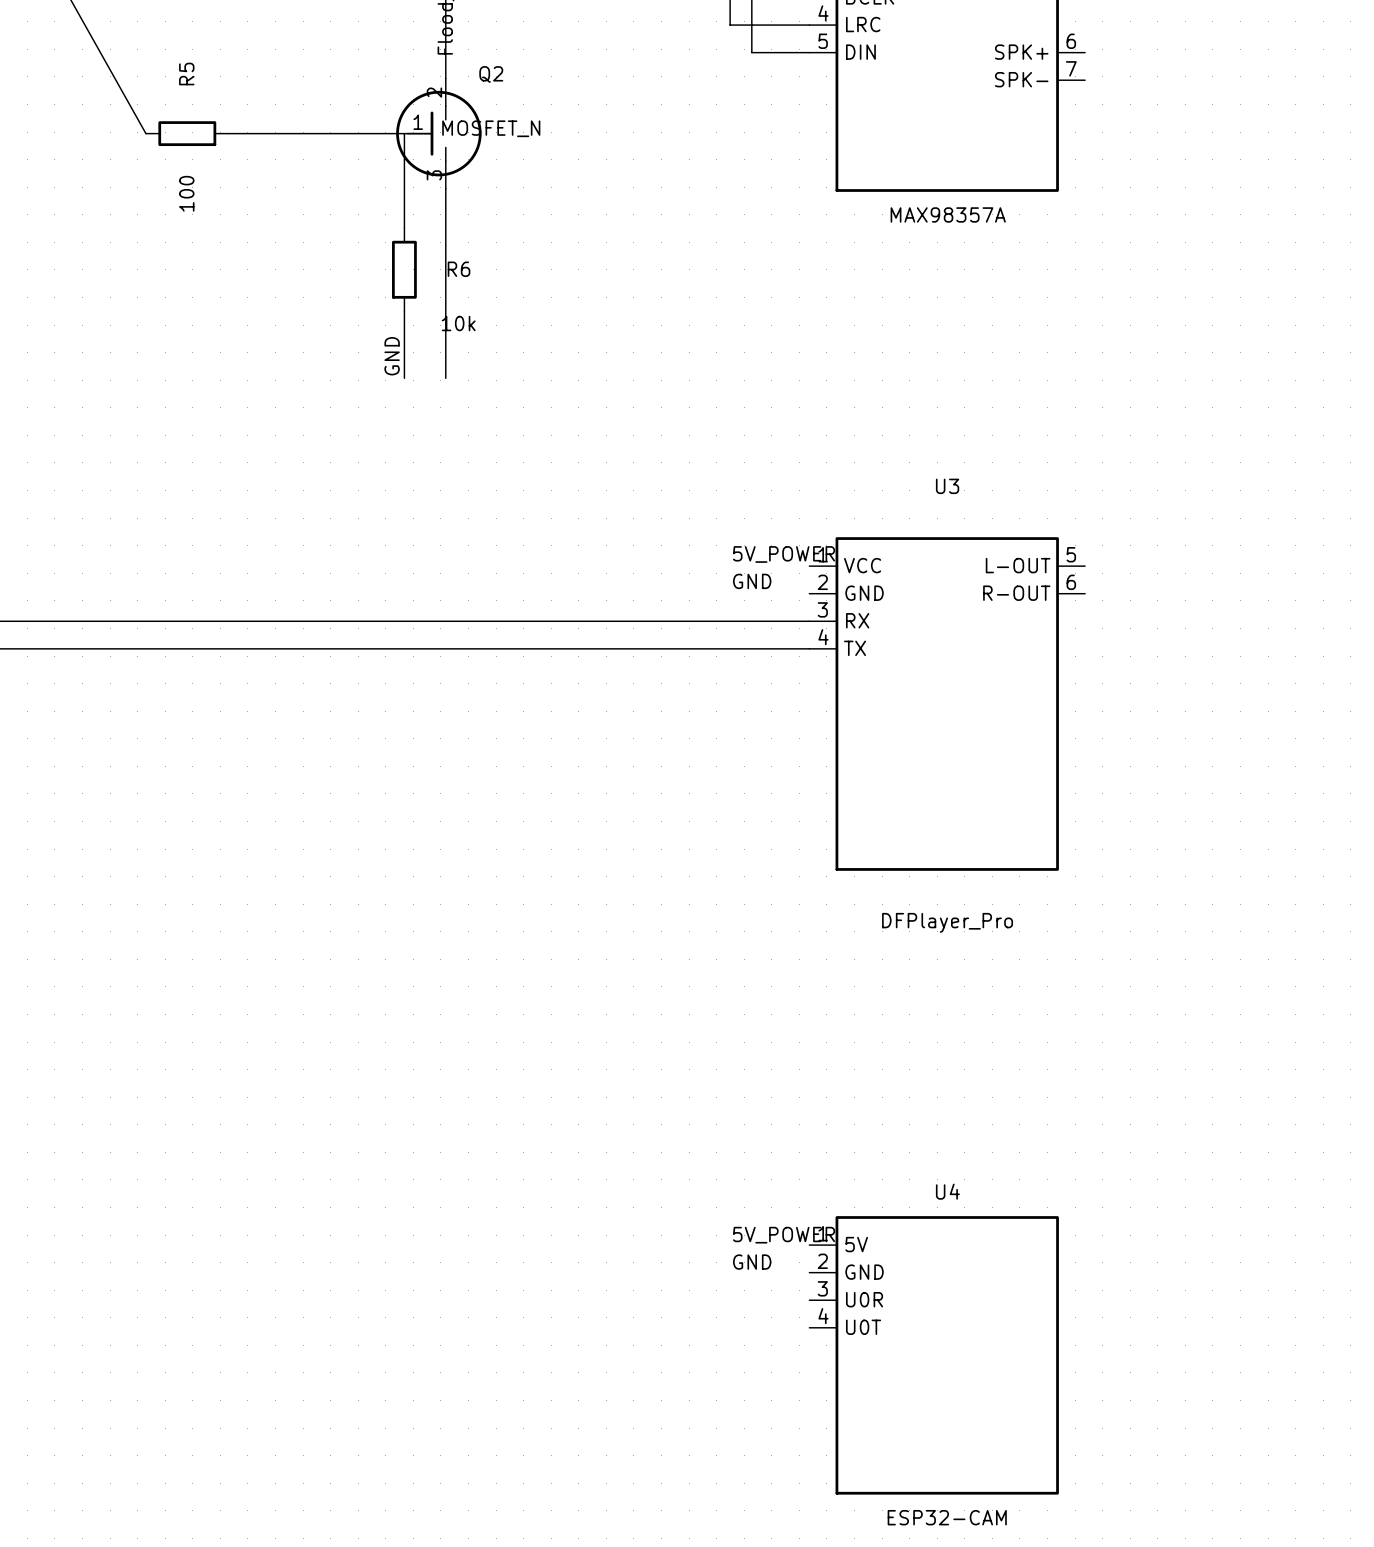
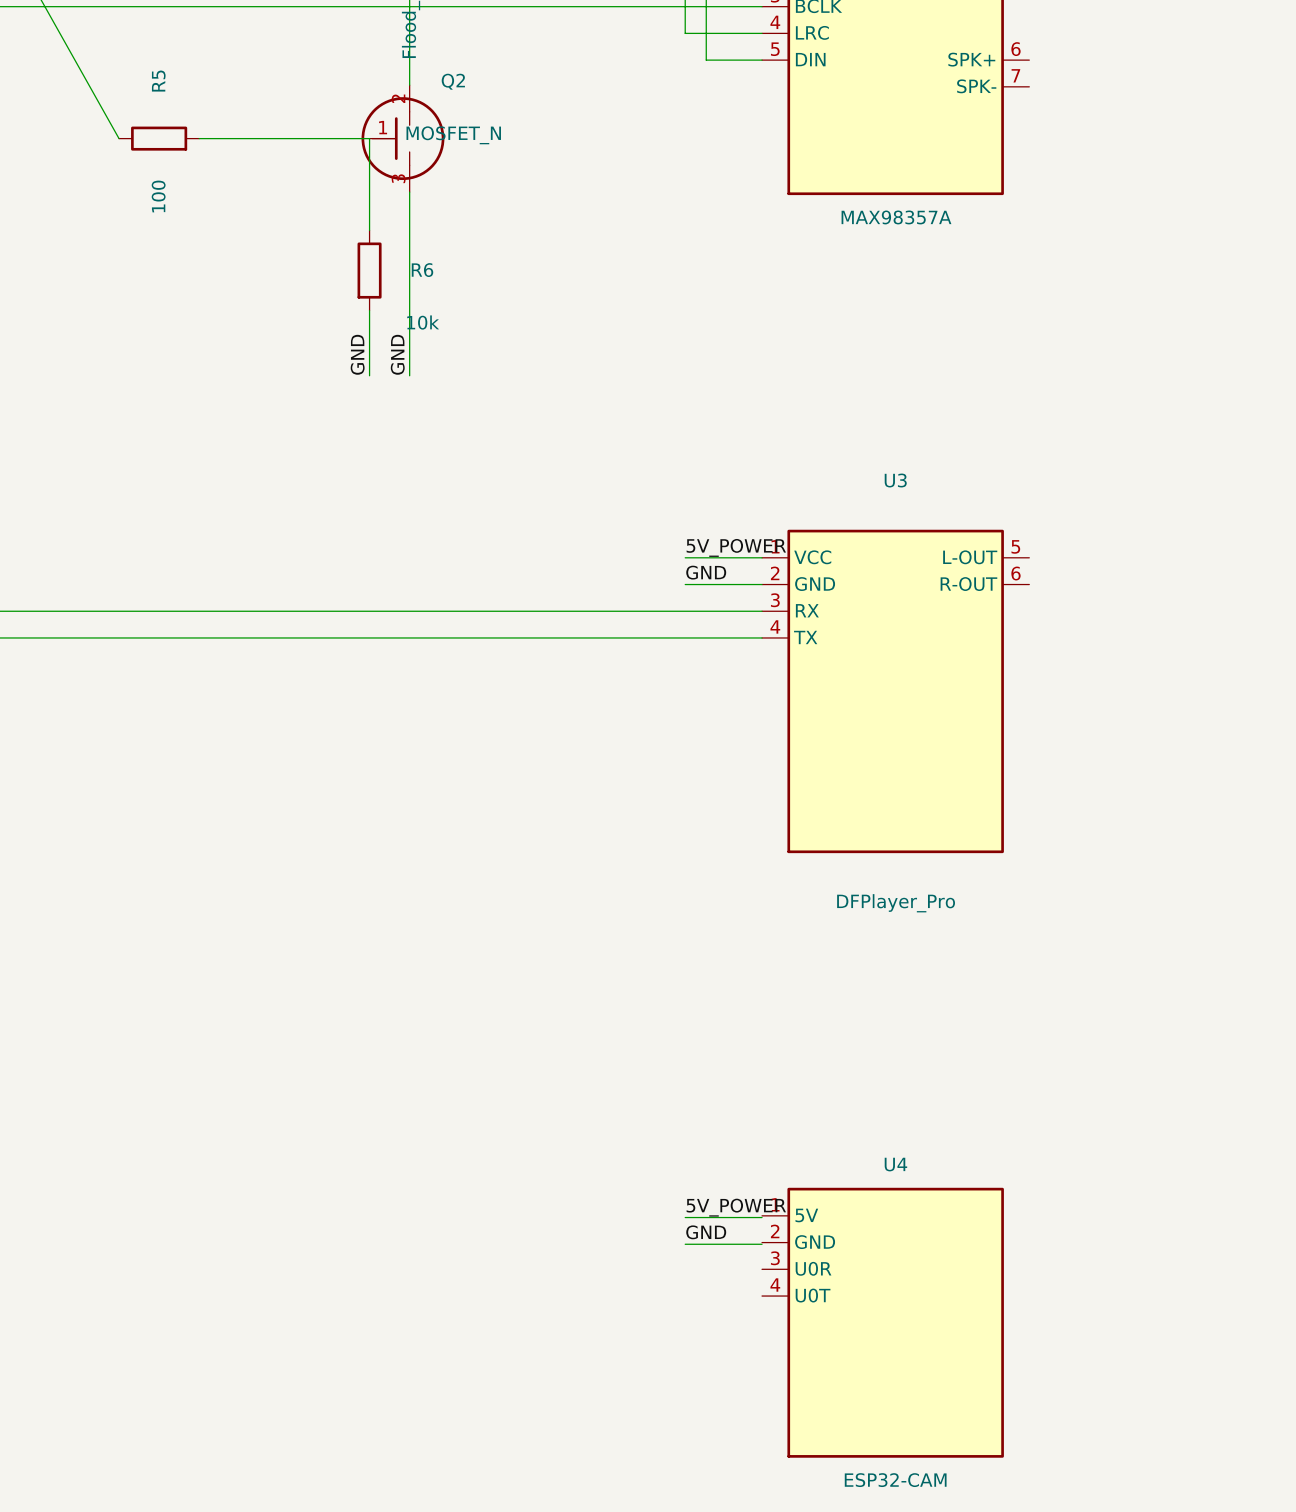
label: none -> GND (397, 354)
wire: none -> (685, 557) (762, 557)
wire: none -> (685, 584) (762, 584)
wire: none -> (685, 1217) (762, 1217)
wire: none -> (685, 1244) (762, 1244)

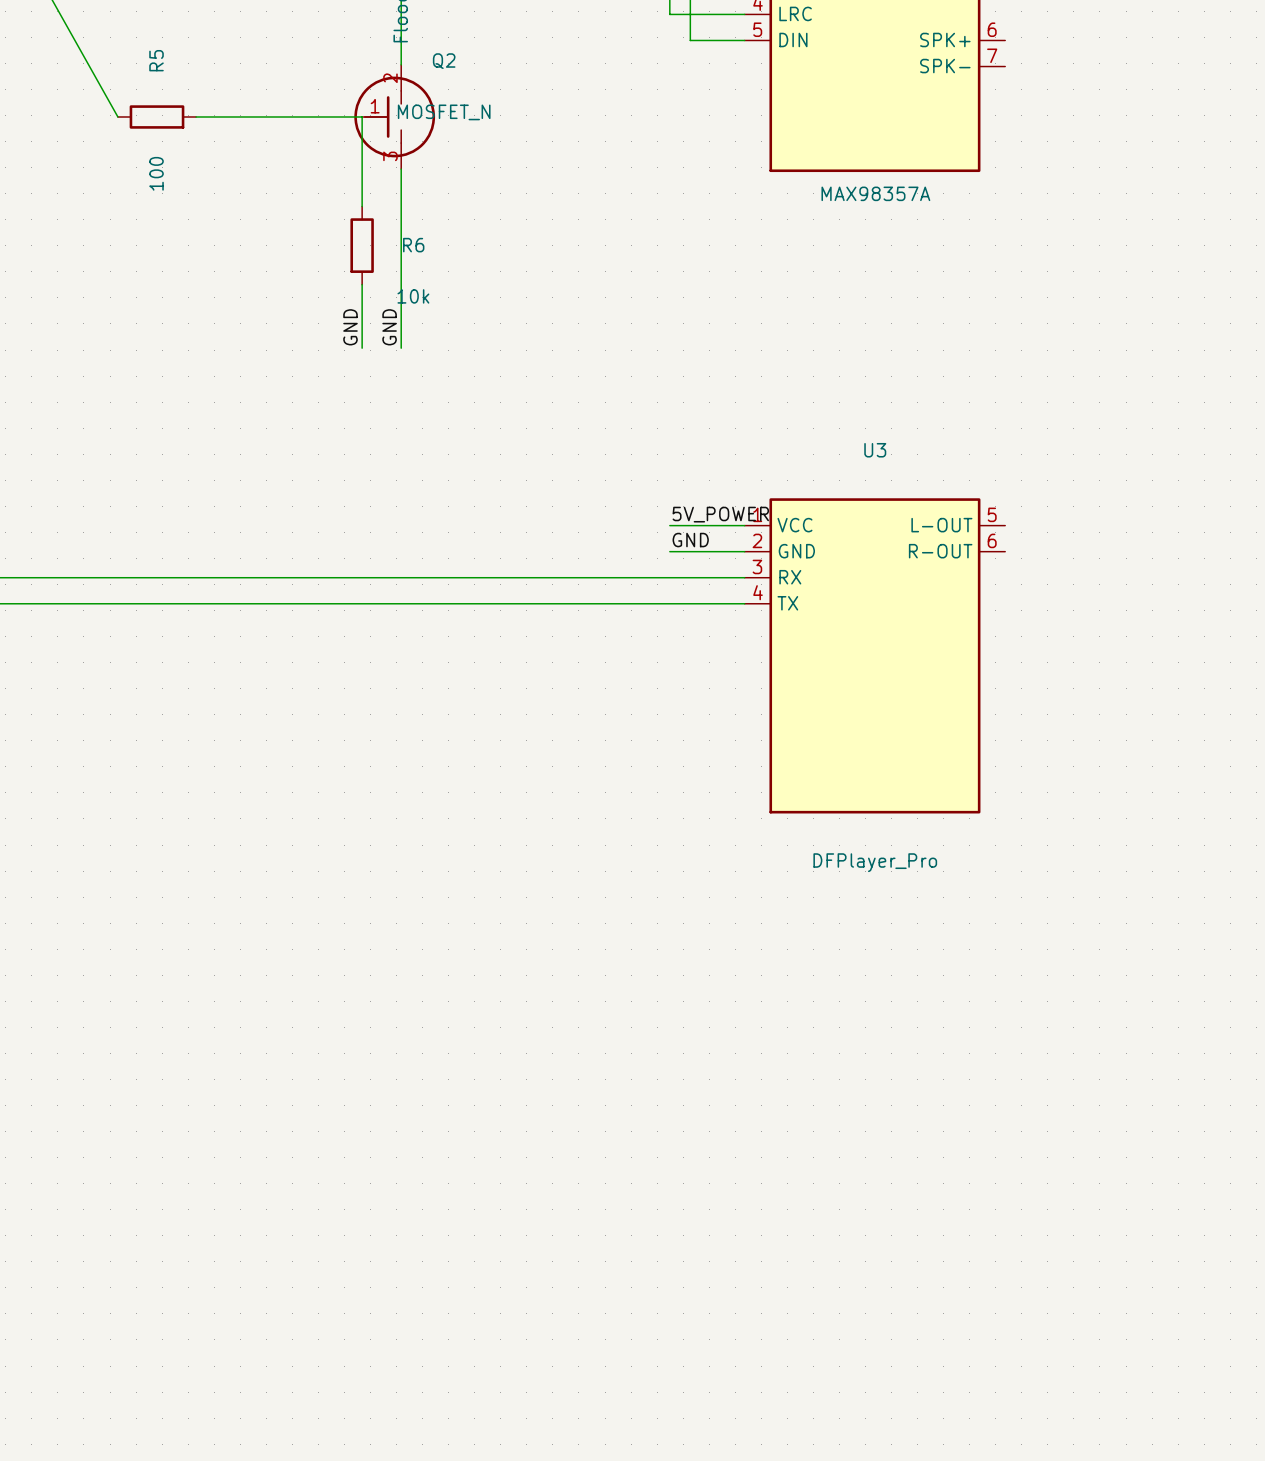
label: 5V_POWER (736, 1207) -> none
wire: (685, 1217) (762, 1217) -> none
label: GND (706, 1232) -> none
wire: (685, 1244) (762, 1244) -> none
U4: ESP32-CAM (882, 1322) -> none

